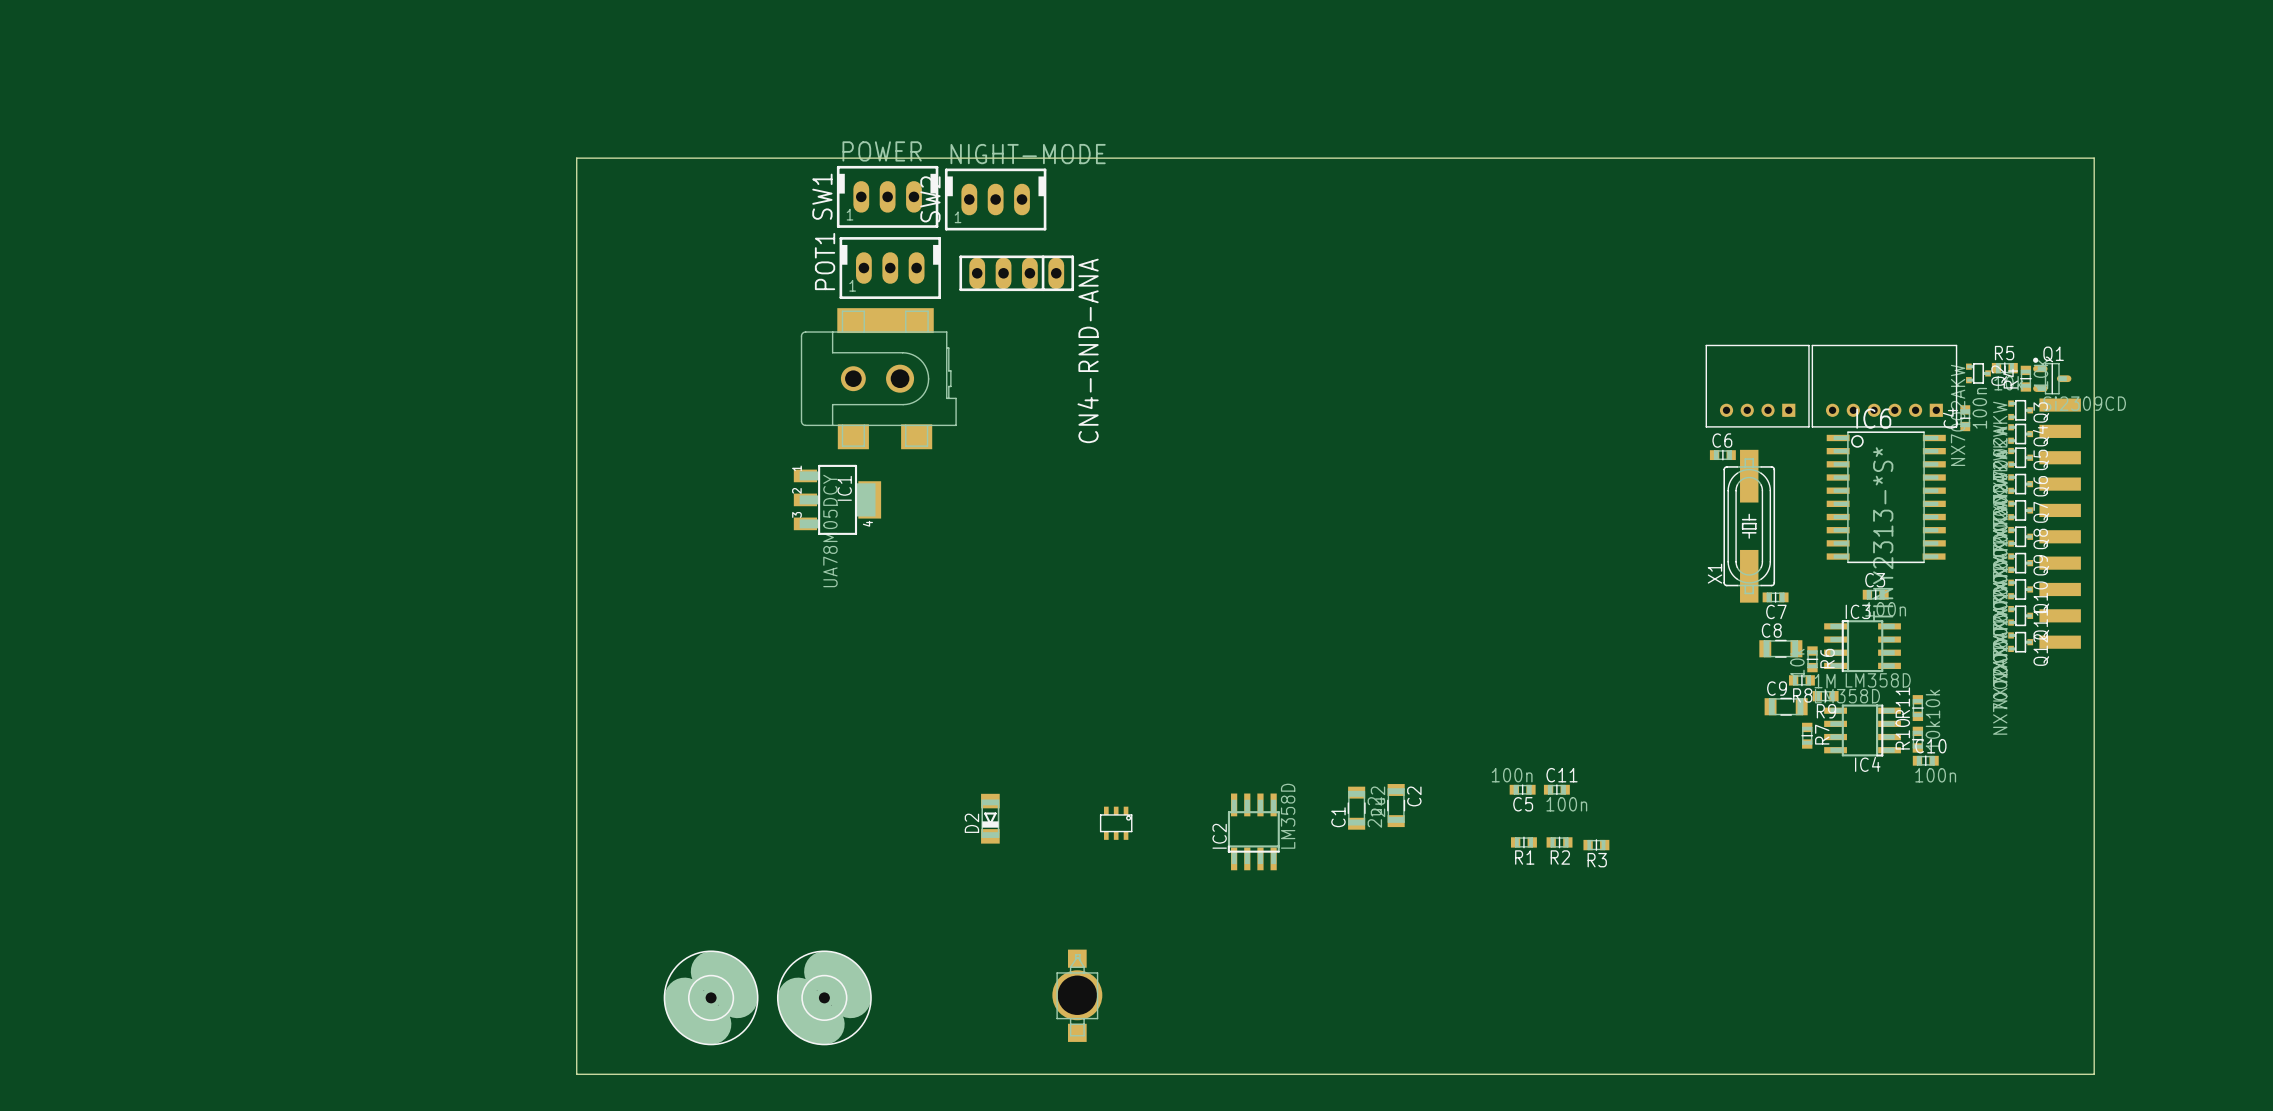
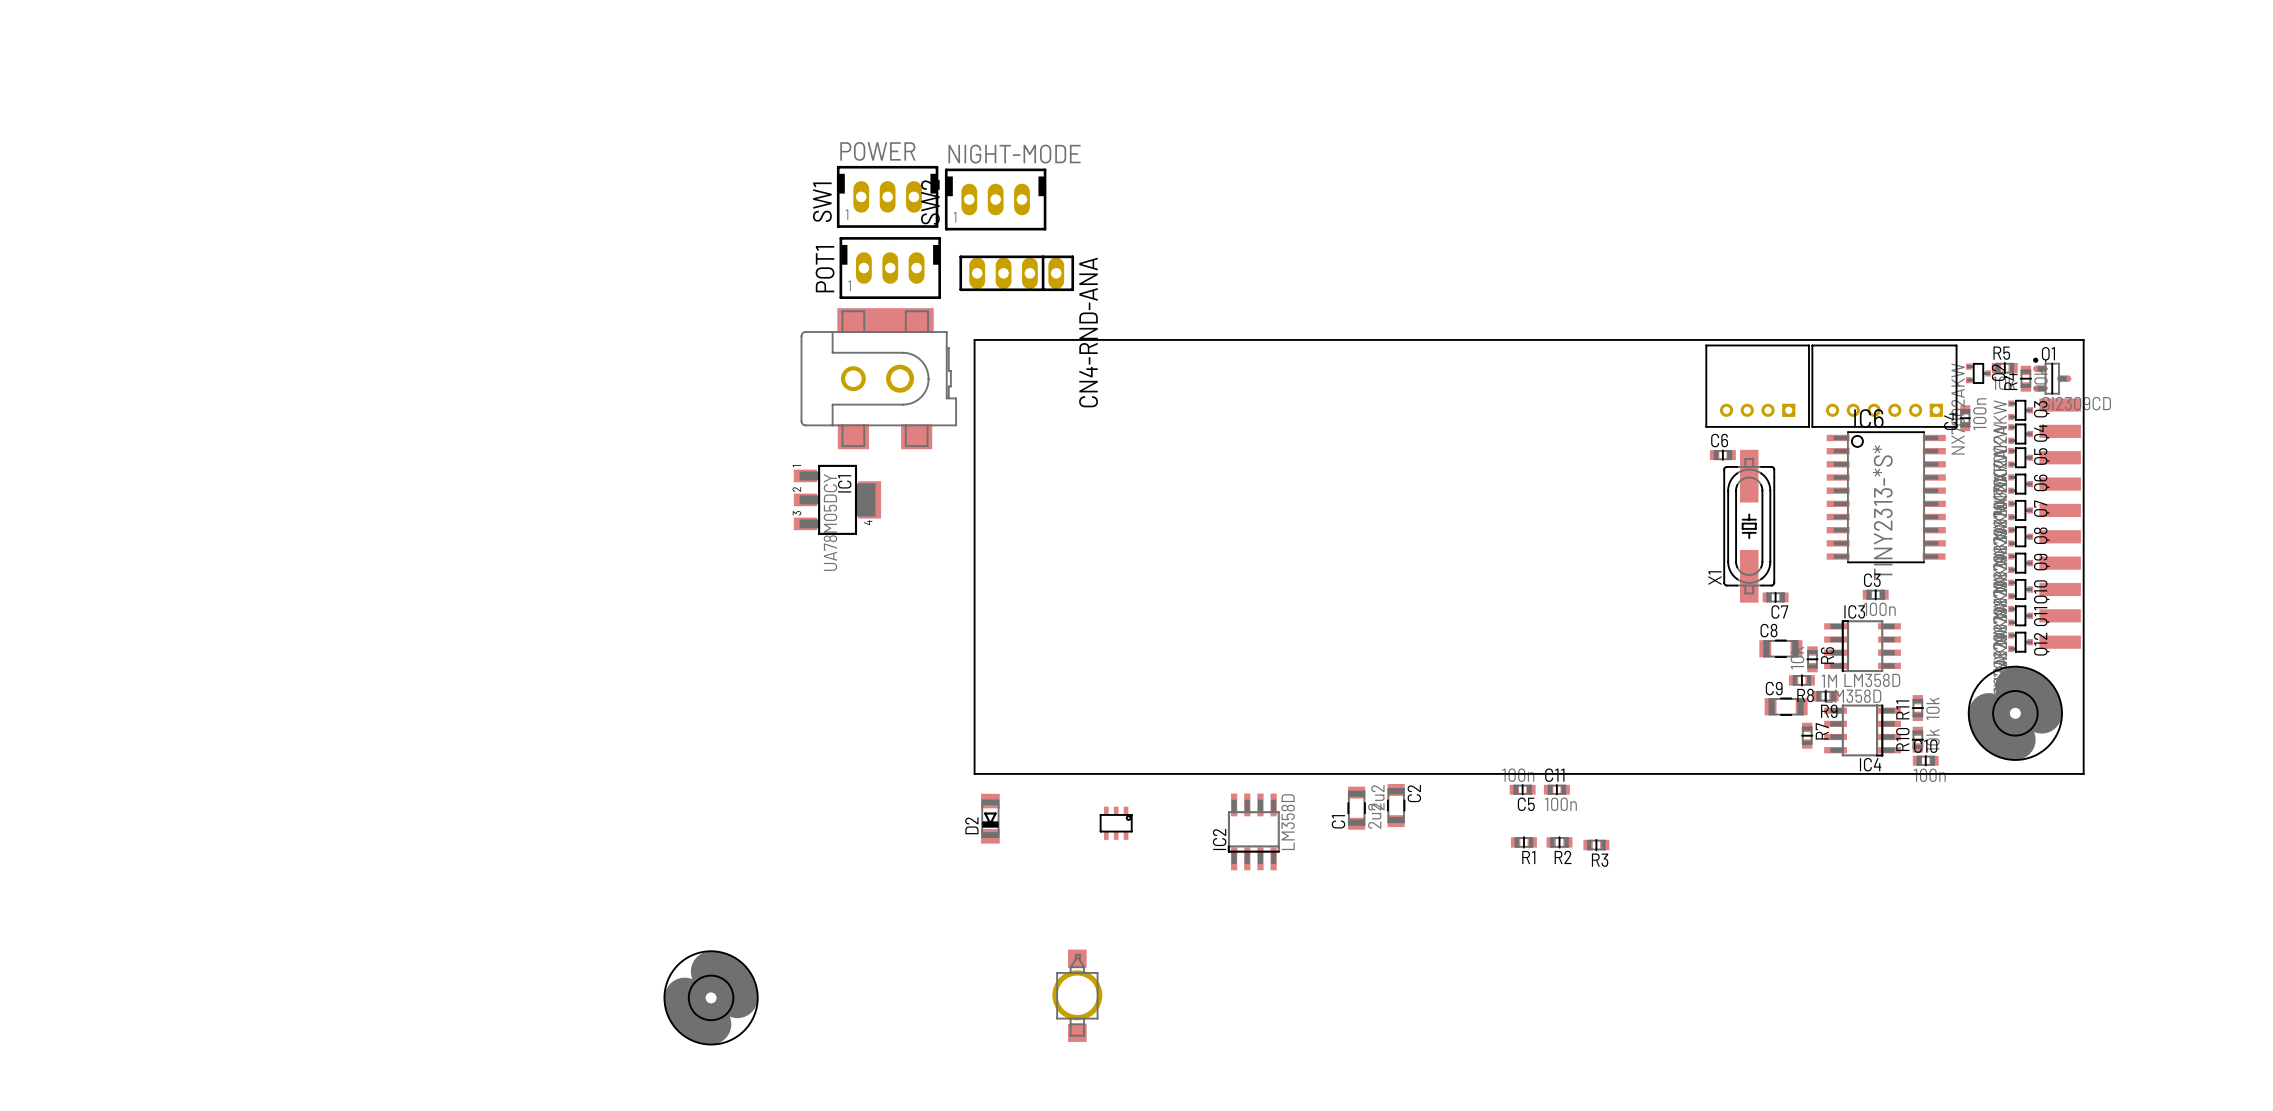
board edge: (576, 158) (2094, 158) (2094, 1074) (576, 1074) (576, 158) -> none
board edge: none -> (974, 339) (2083, 339) (2083, 773) (974, 773) (974, 339)
part: none -> (2015, 713)
part: (824, 997) -> none

